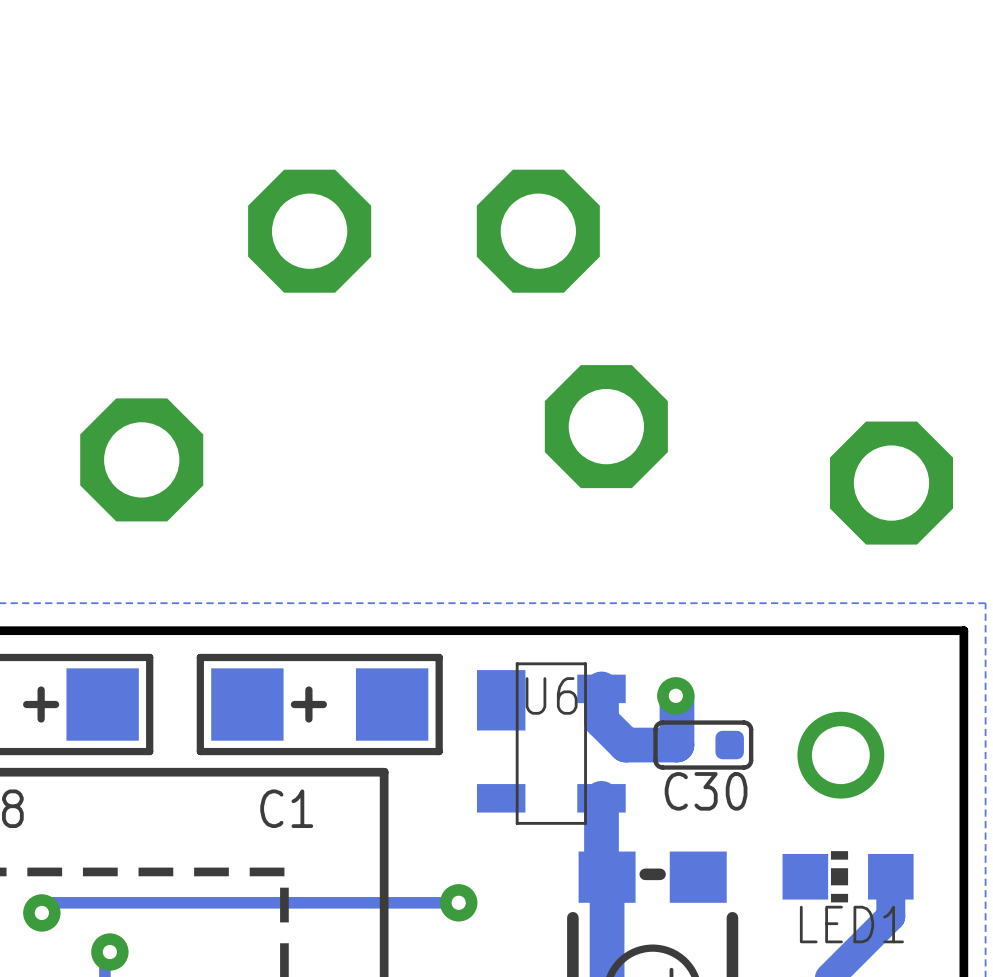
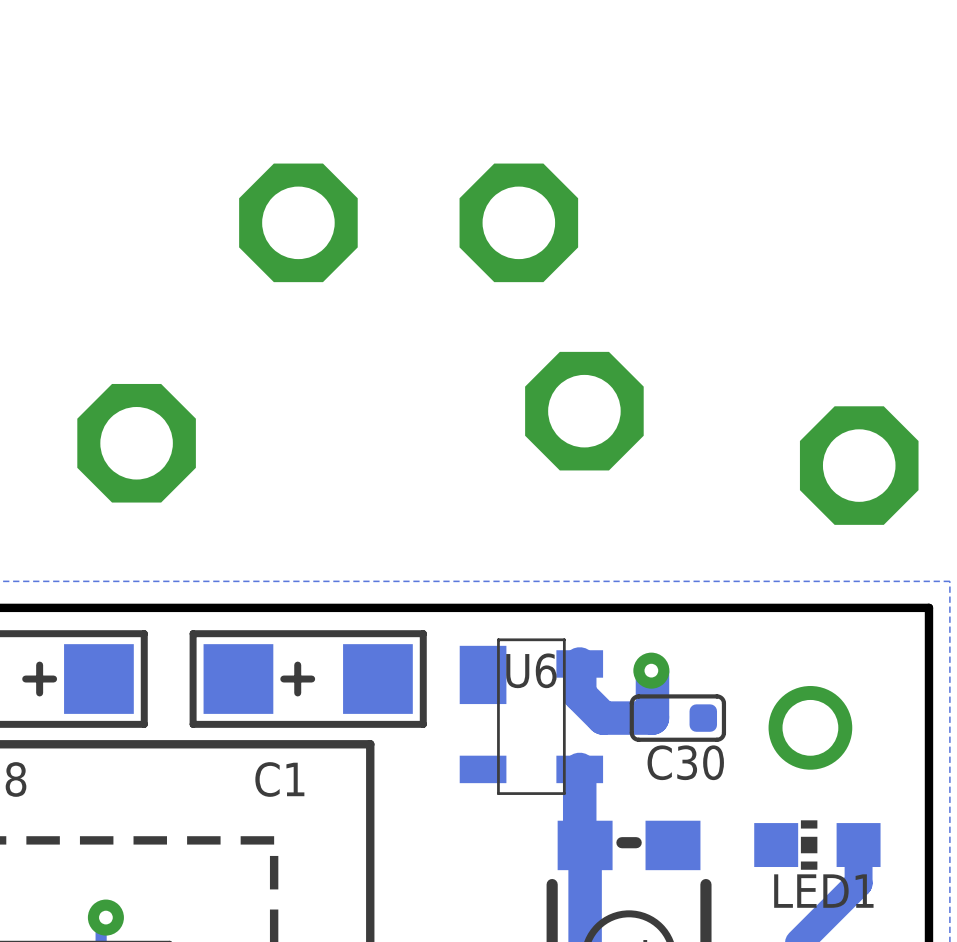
track: (458, 902) (51, 902) (41, 912) -> none
via: (458, 902) -> none
via: (41, 912) -> none

